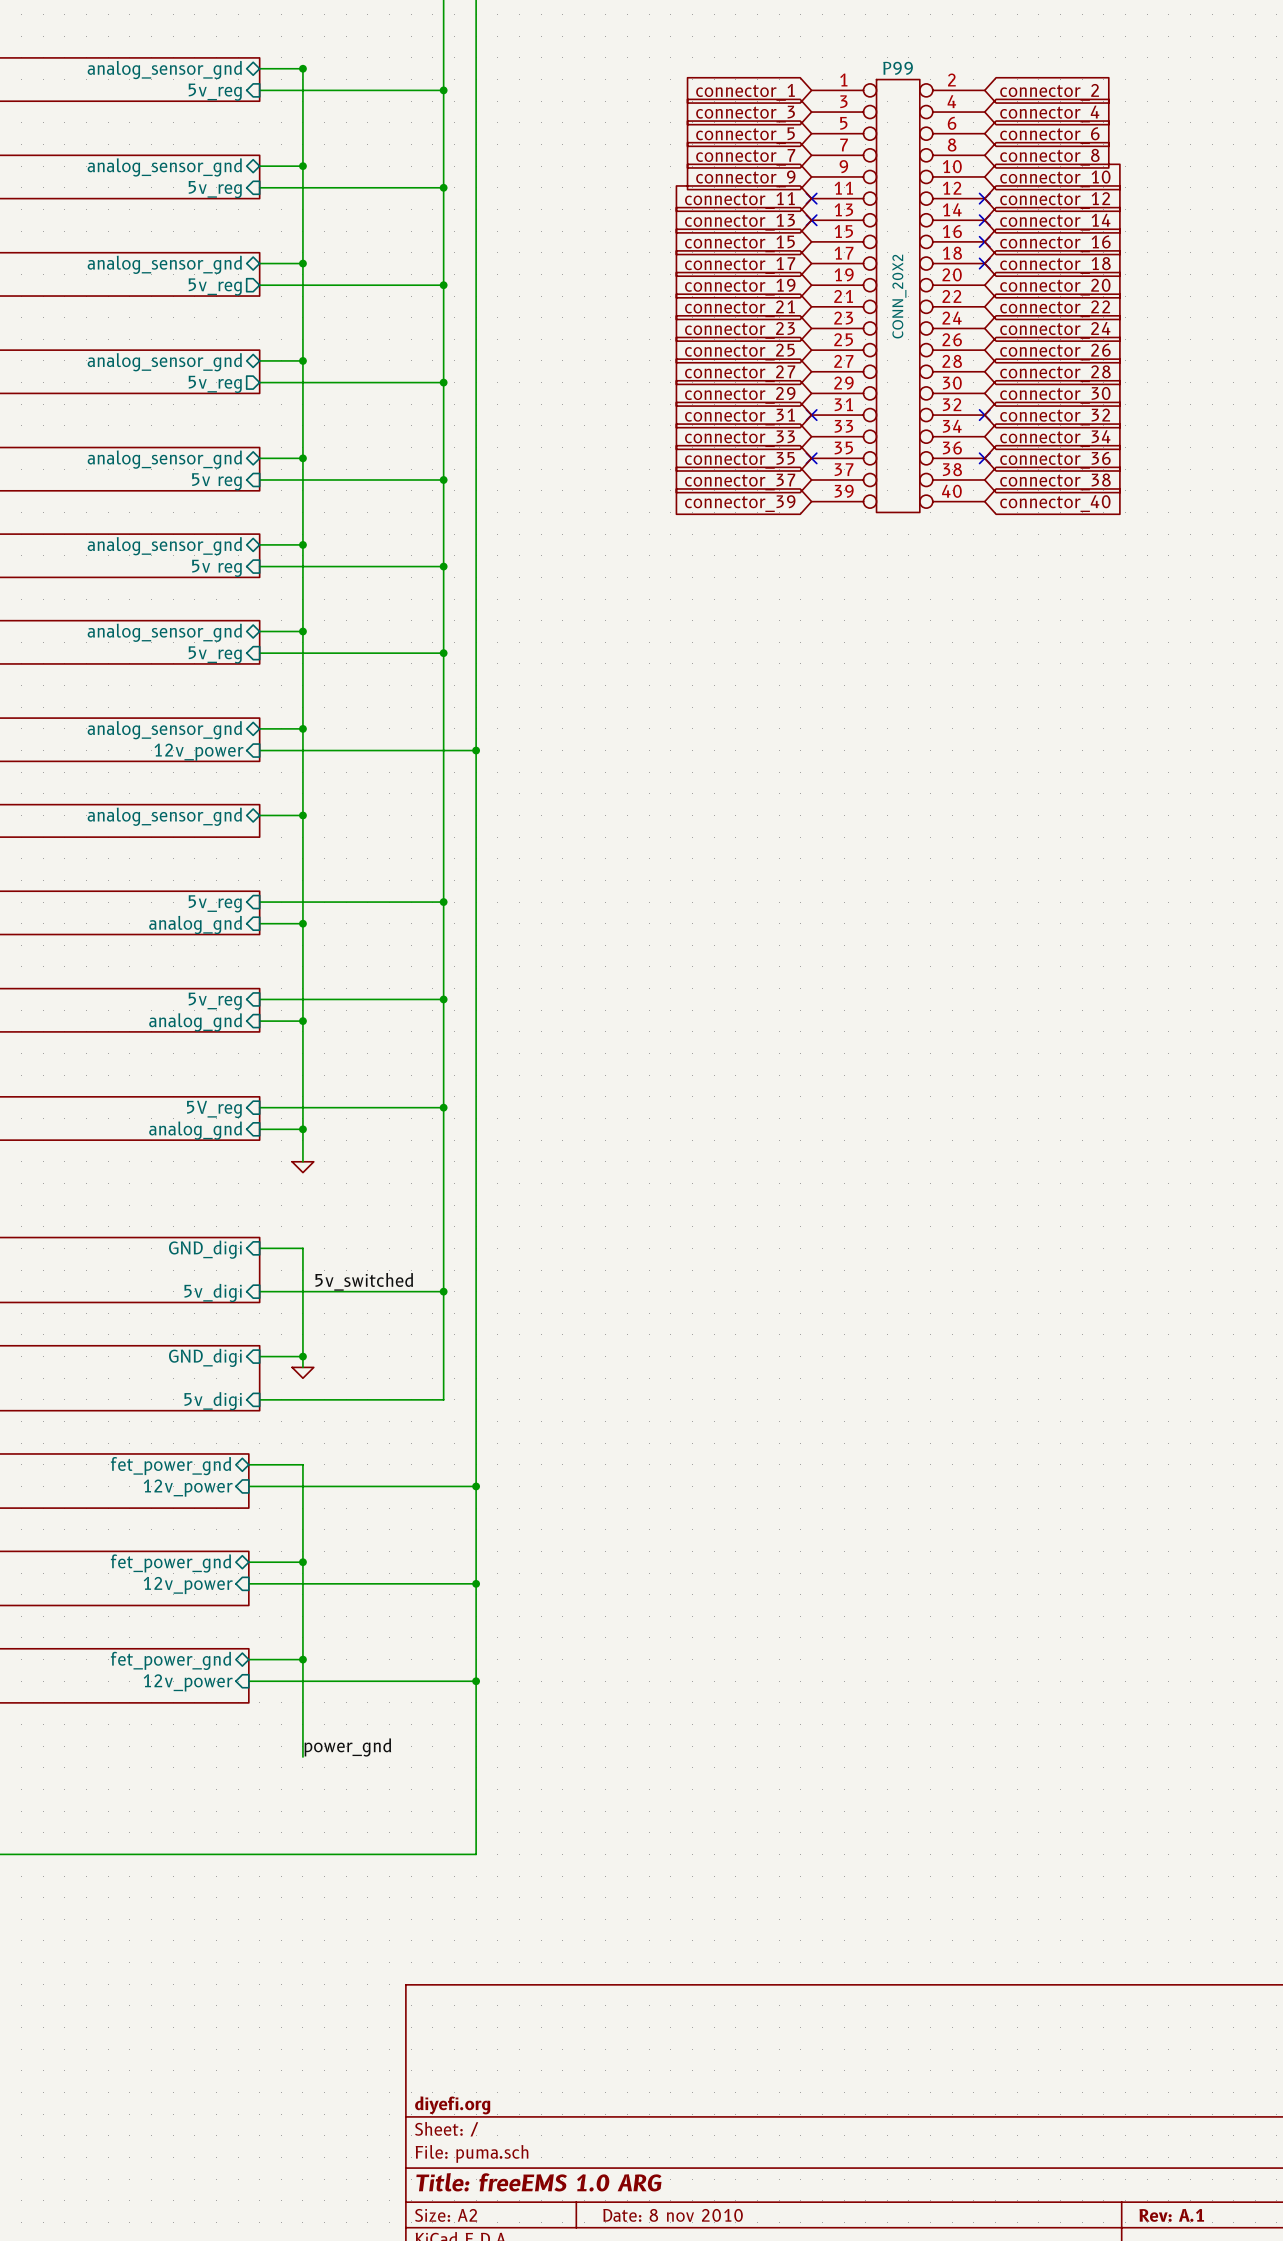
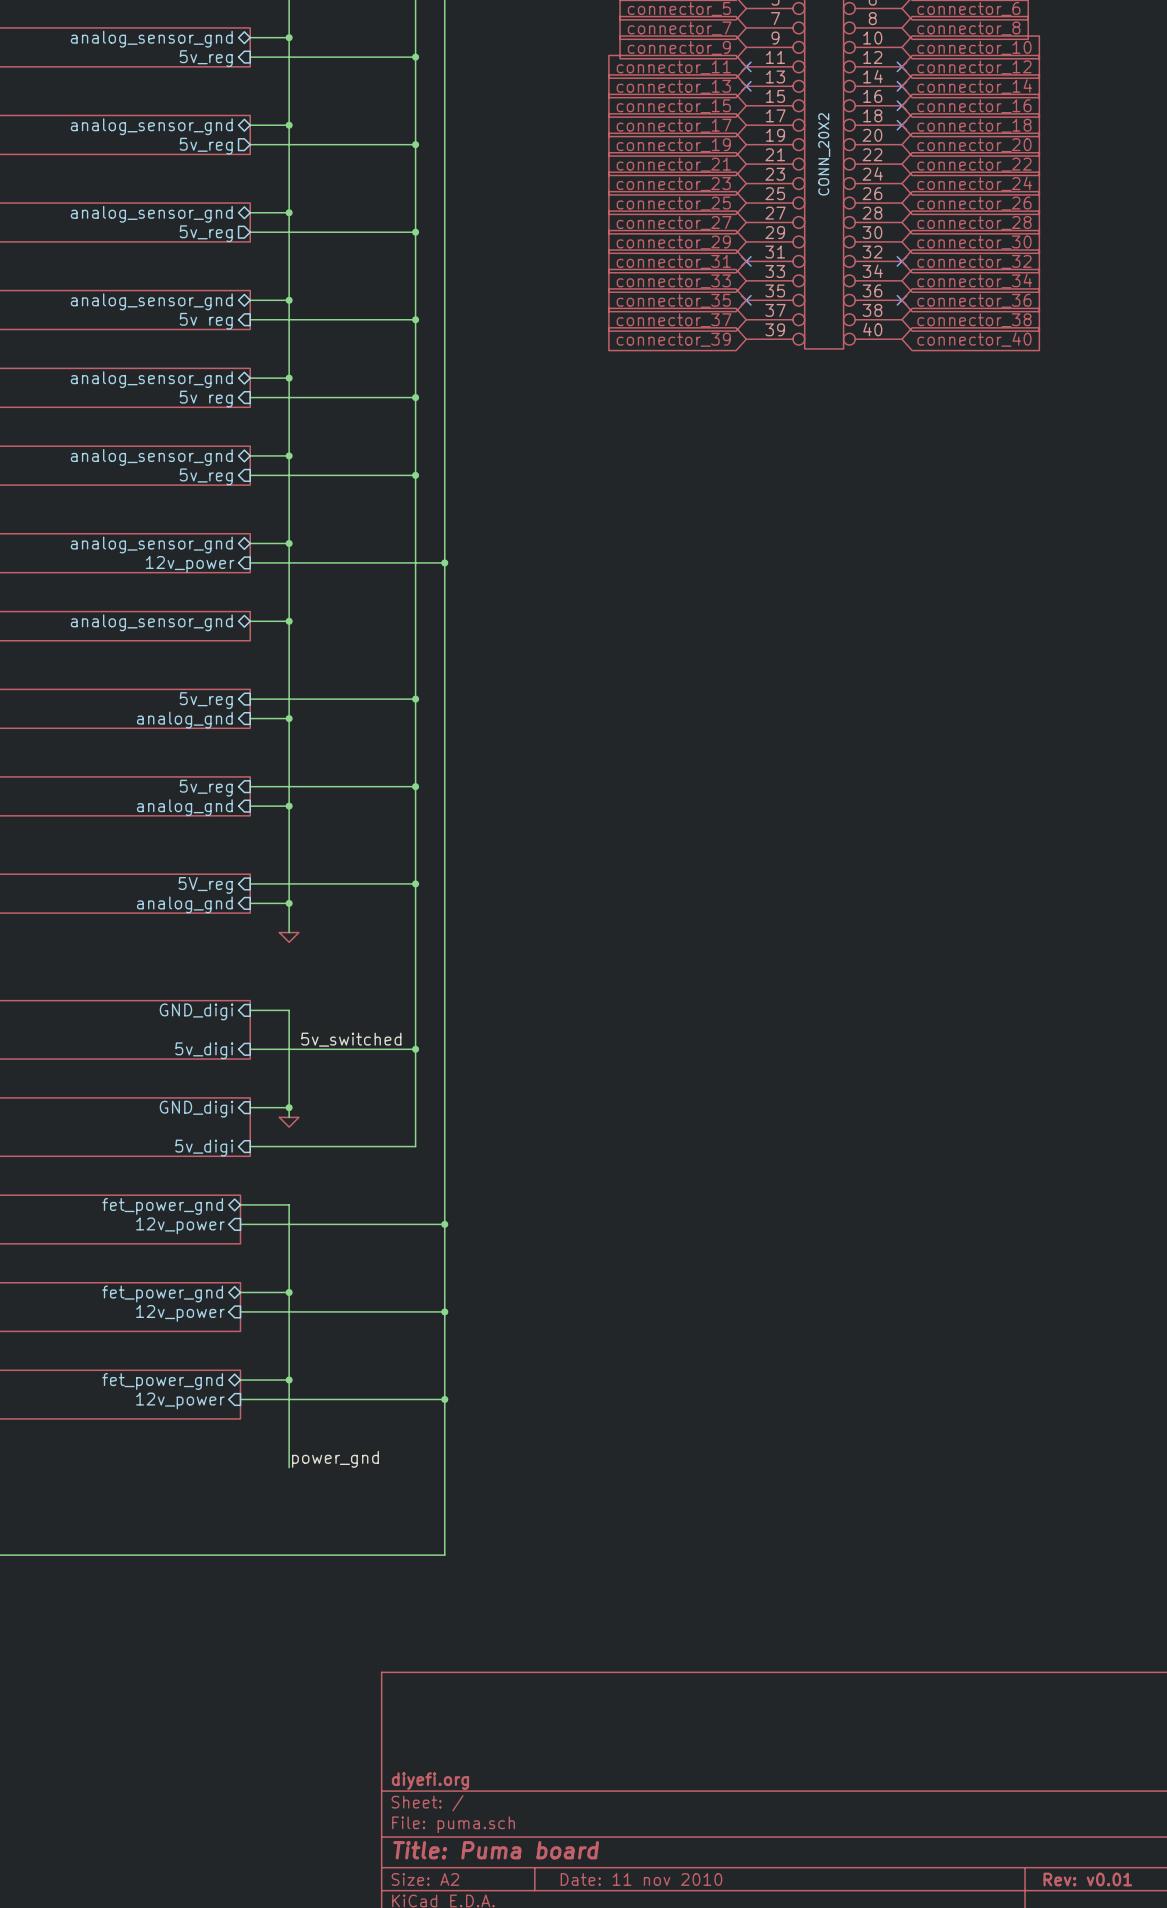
title block: Title: freeEMS 1.0 ARG (538, 2182) -> Title: Puma board (496, 1850)
title block: Date: 8 nov 2010 (673, 2215) -> Date: 11 nov 2010 (641, 1879)
title block: Rev: A.1 (1171, 2215) -> Rev: v0.01 (1087, 1879)

